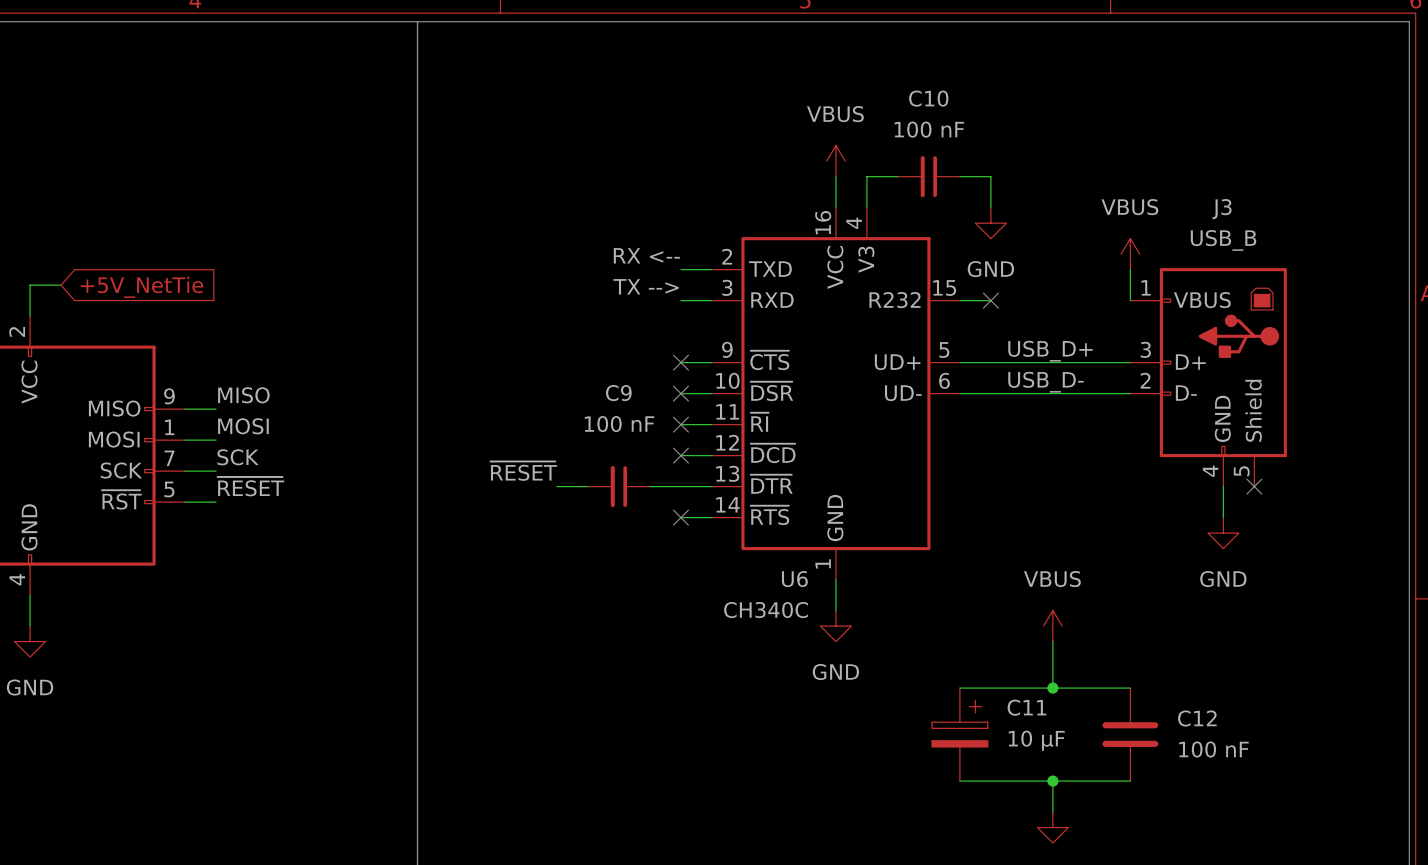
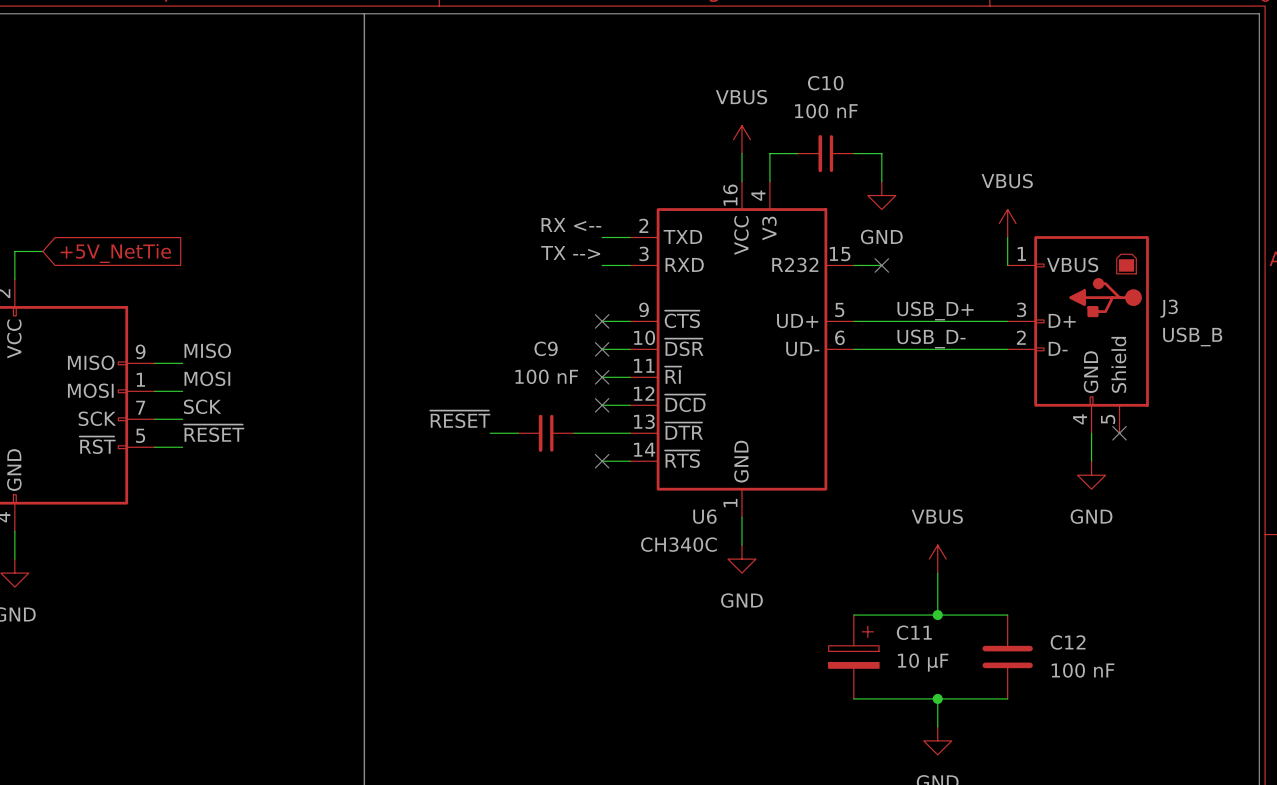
J3 name position: J3 (1221, 209) -> J3 (1169, 308)
J3 value position: USB_B (1223, 240) -> USB_B (1192, 336)

